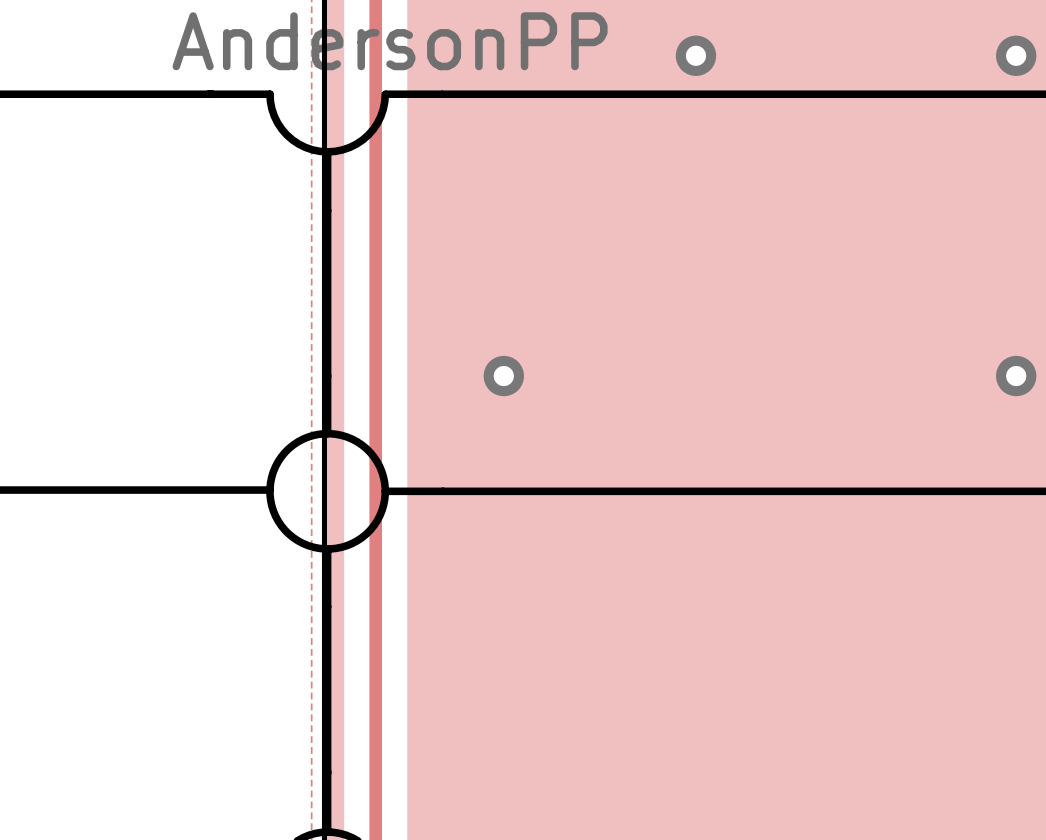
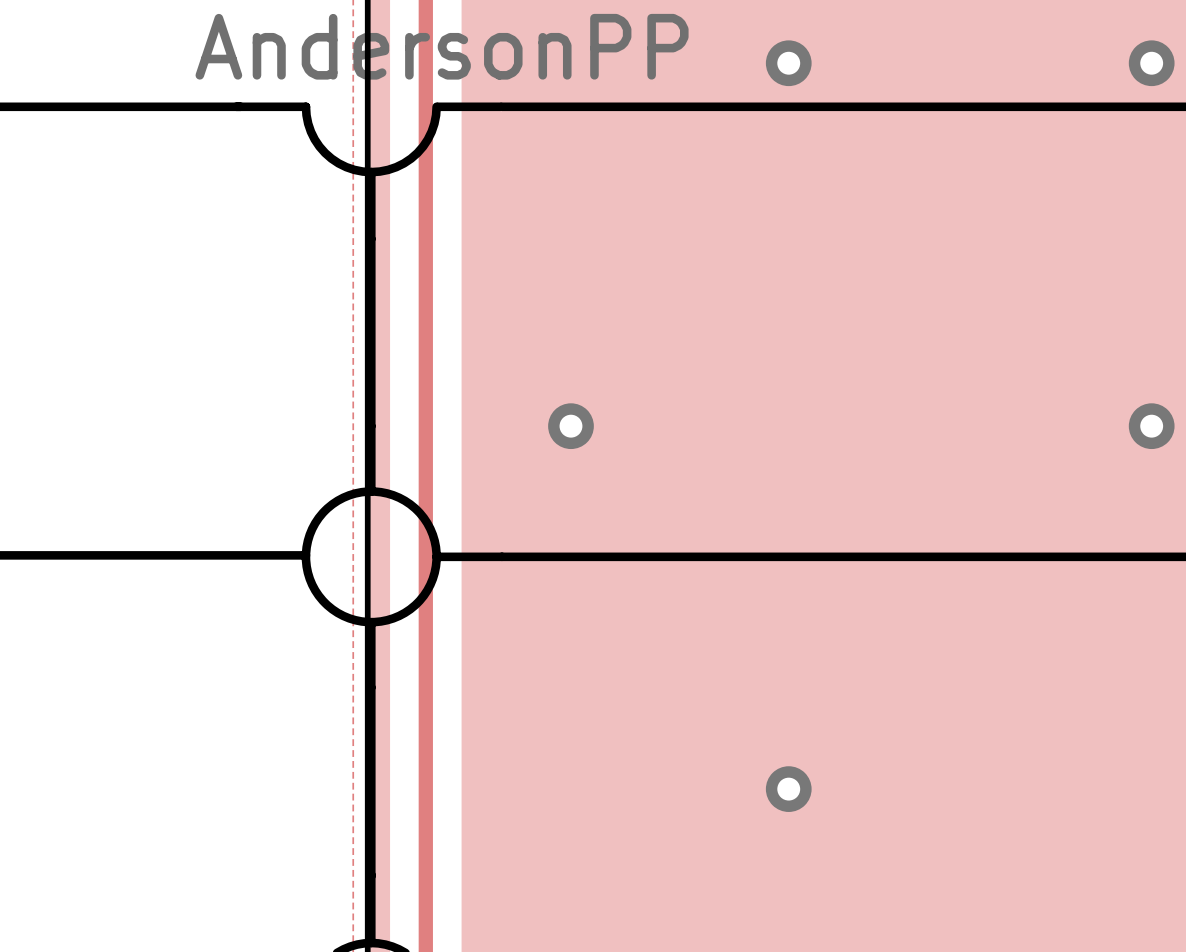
via: none -> (788, 789)

